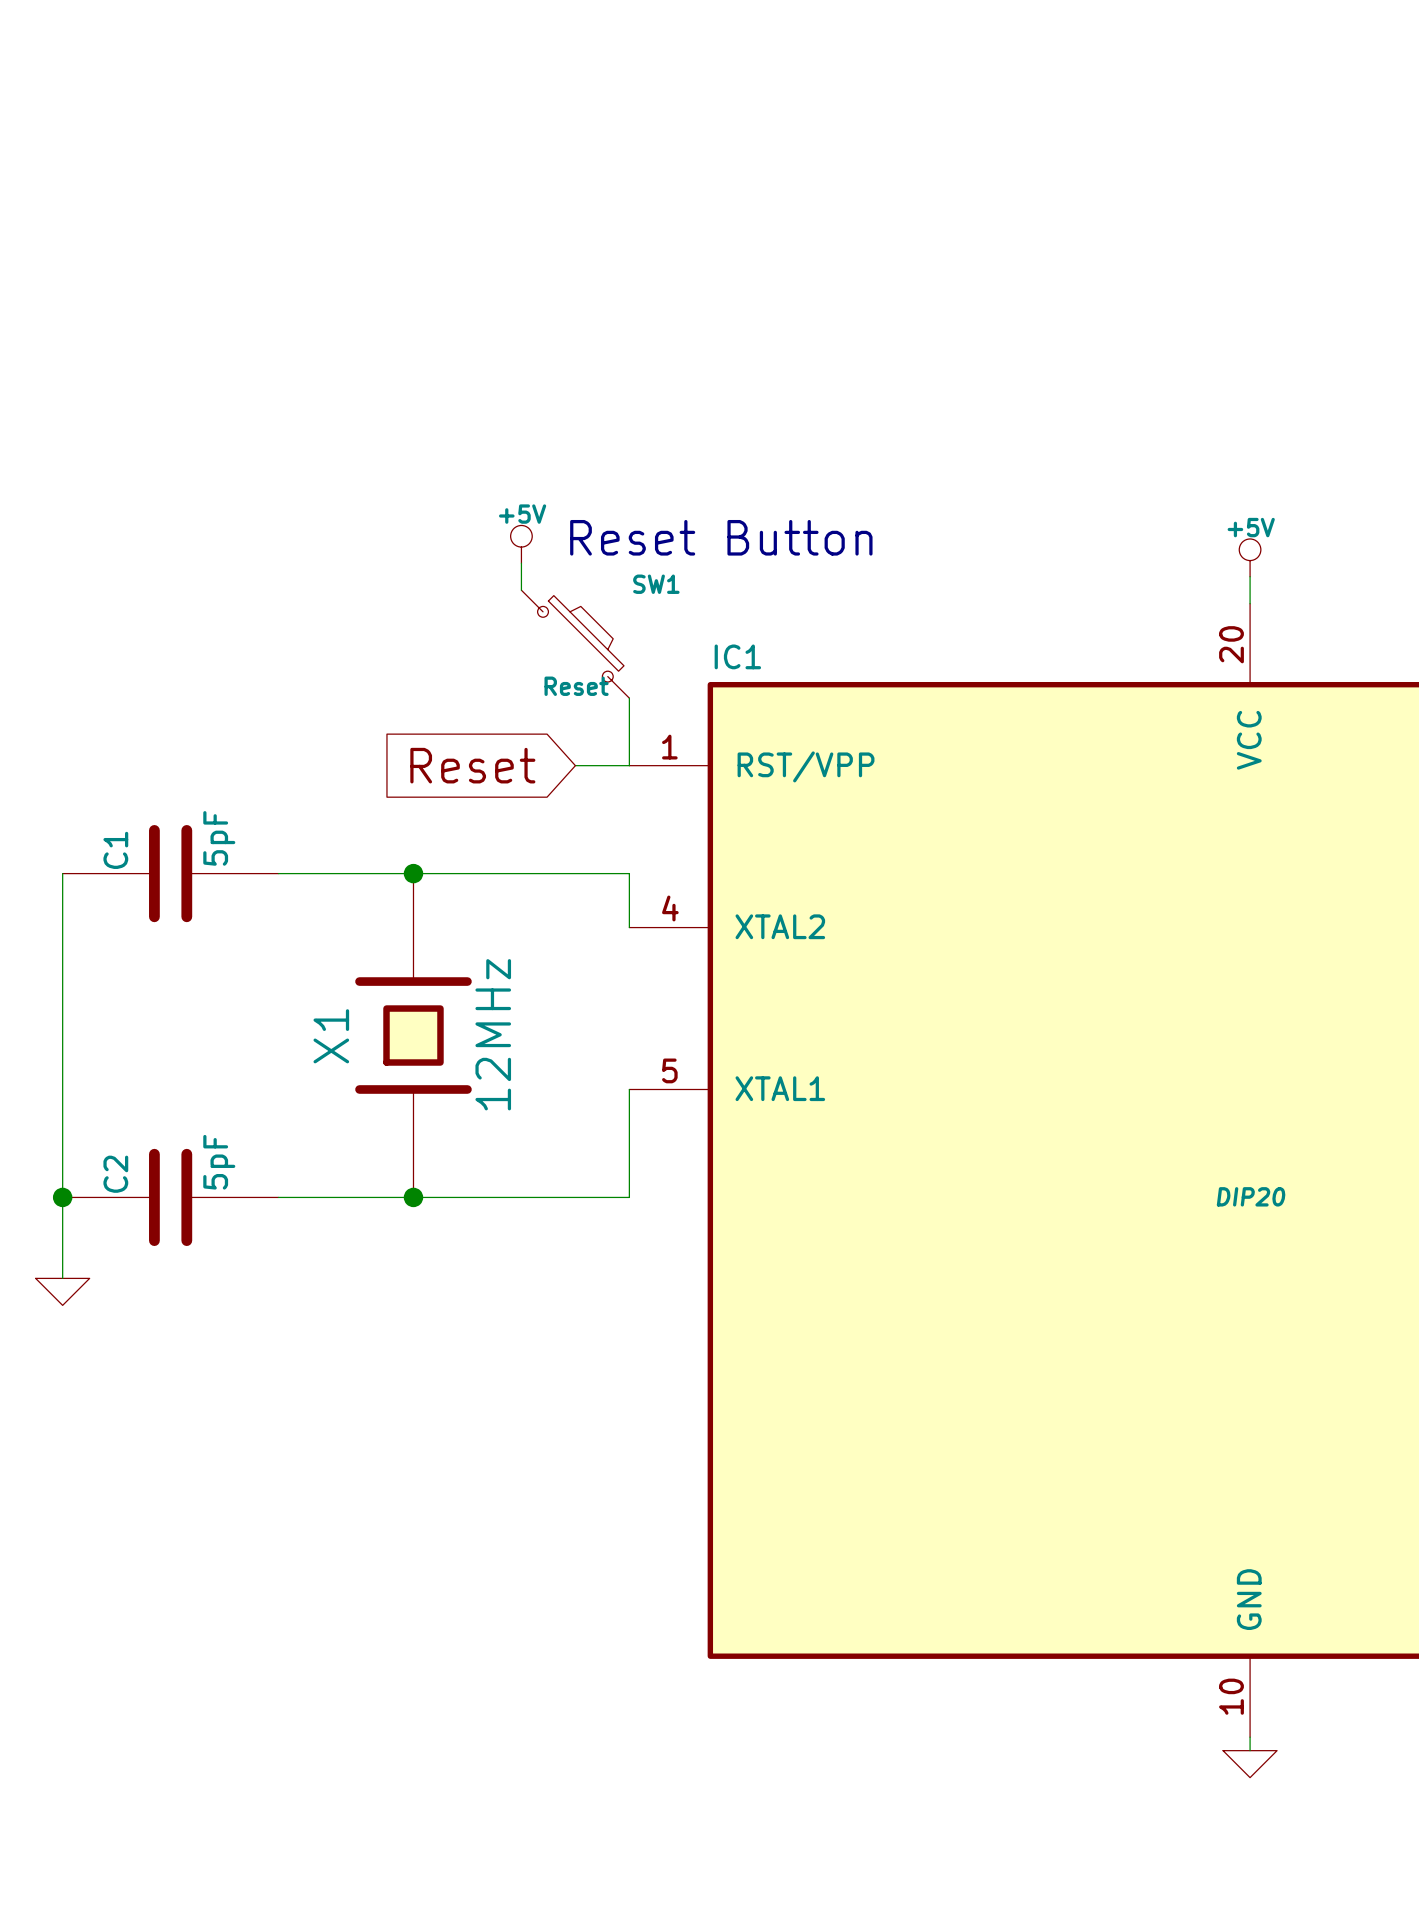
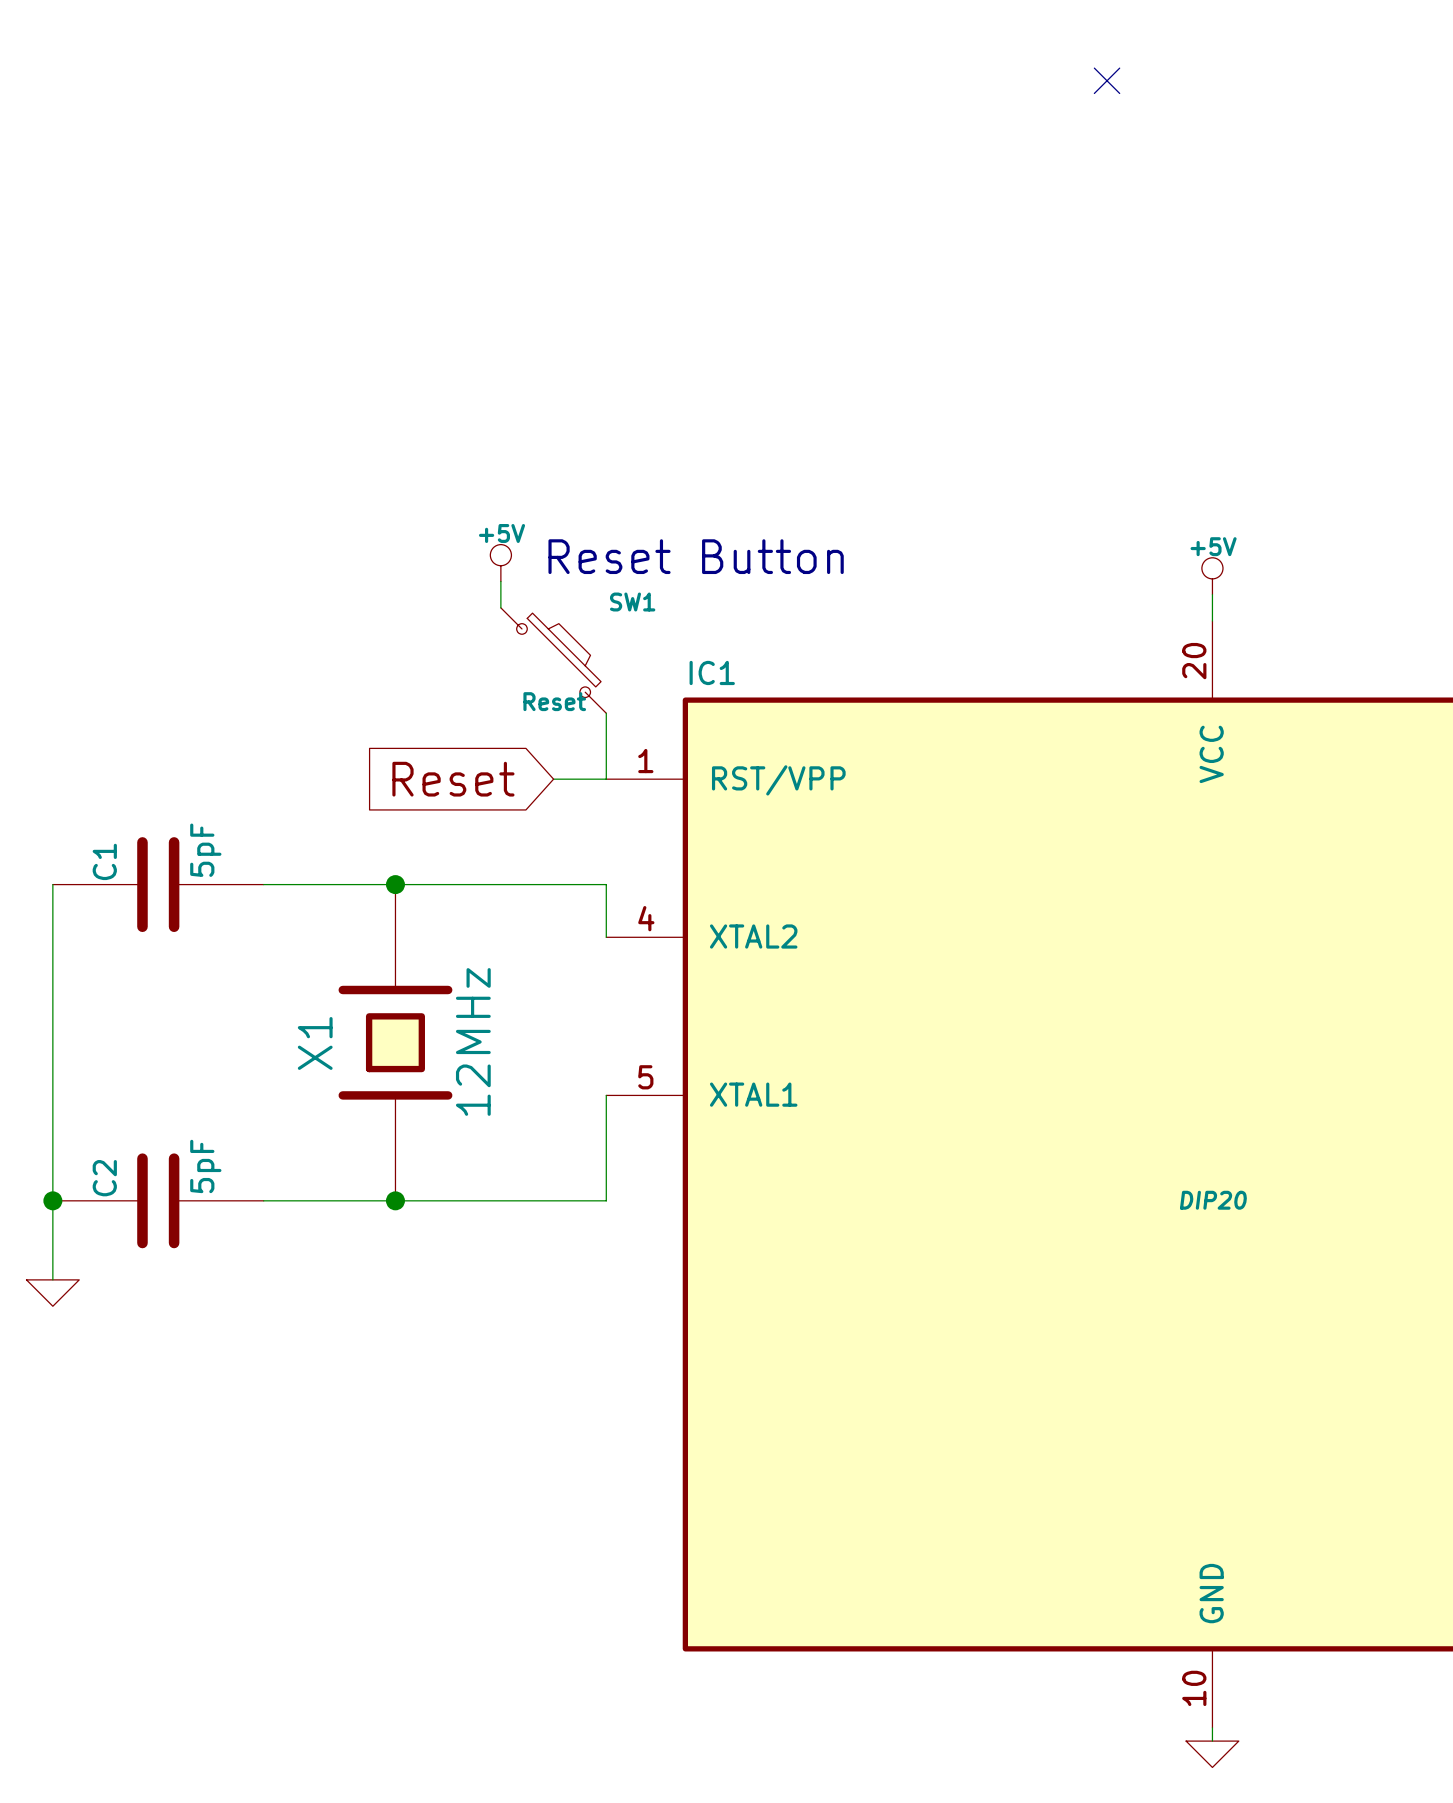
no-connect mark: none -> (1107, 80)

